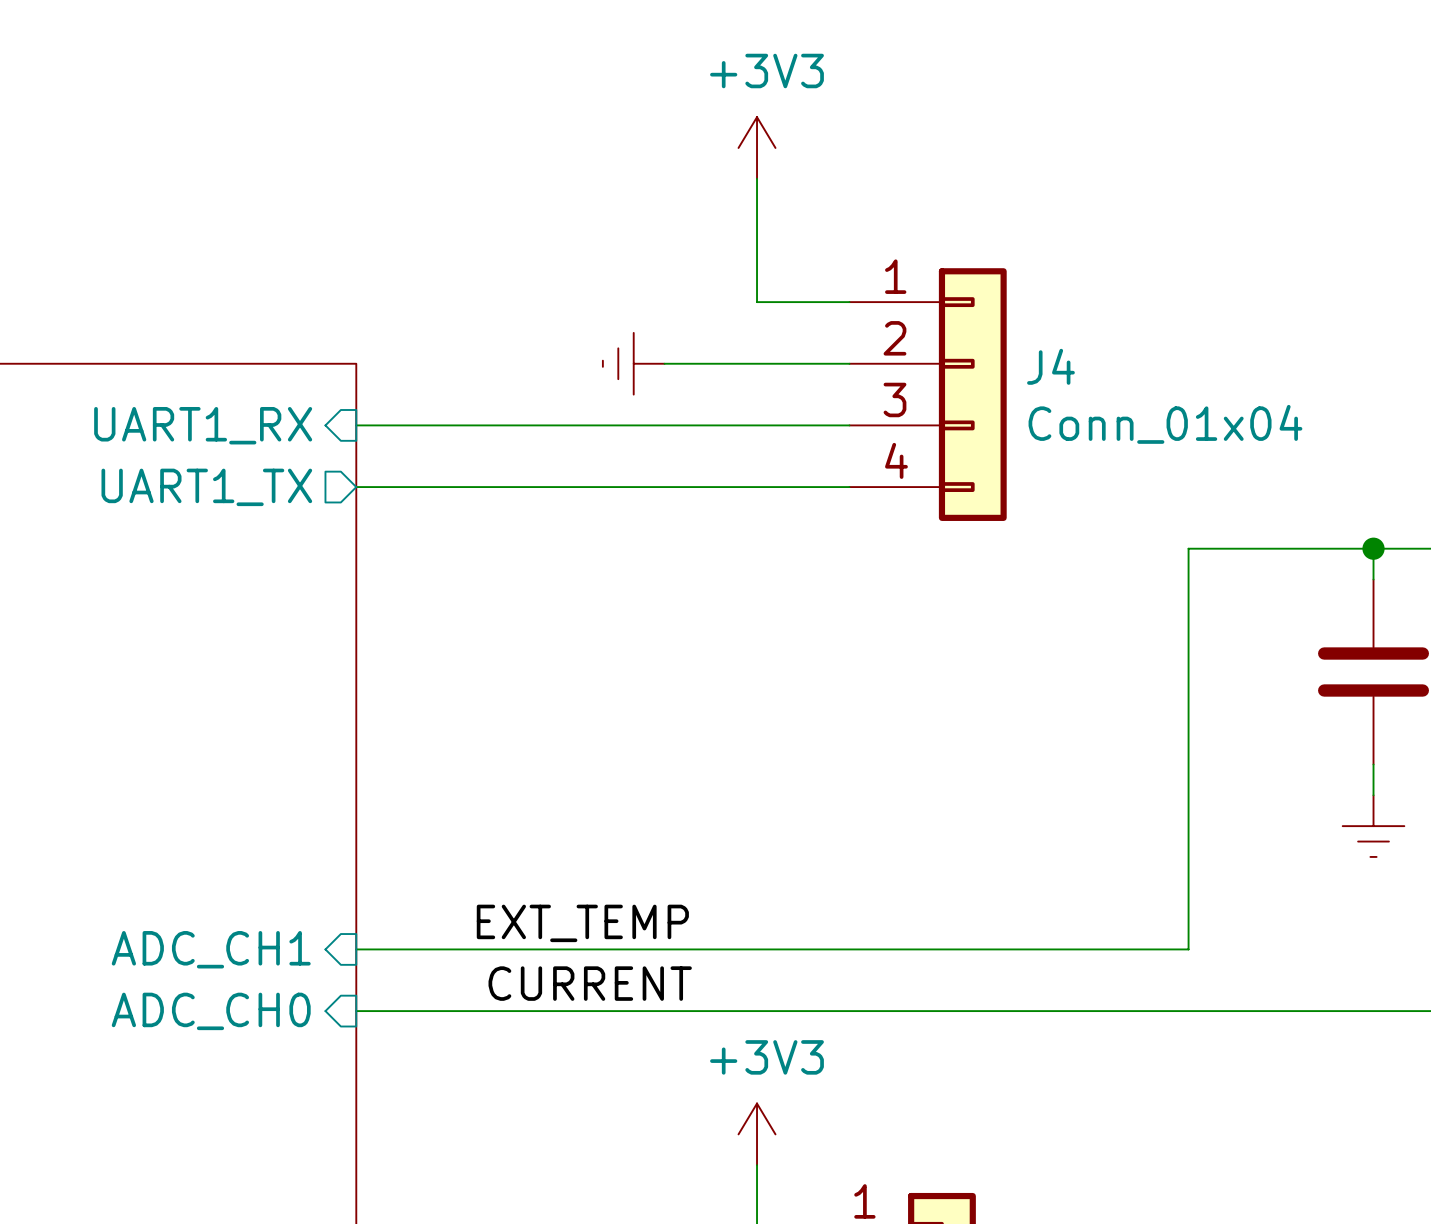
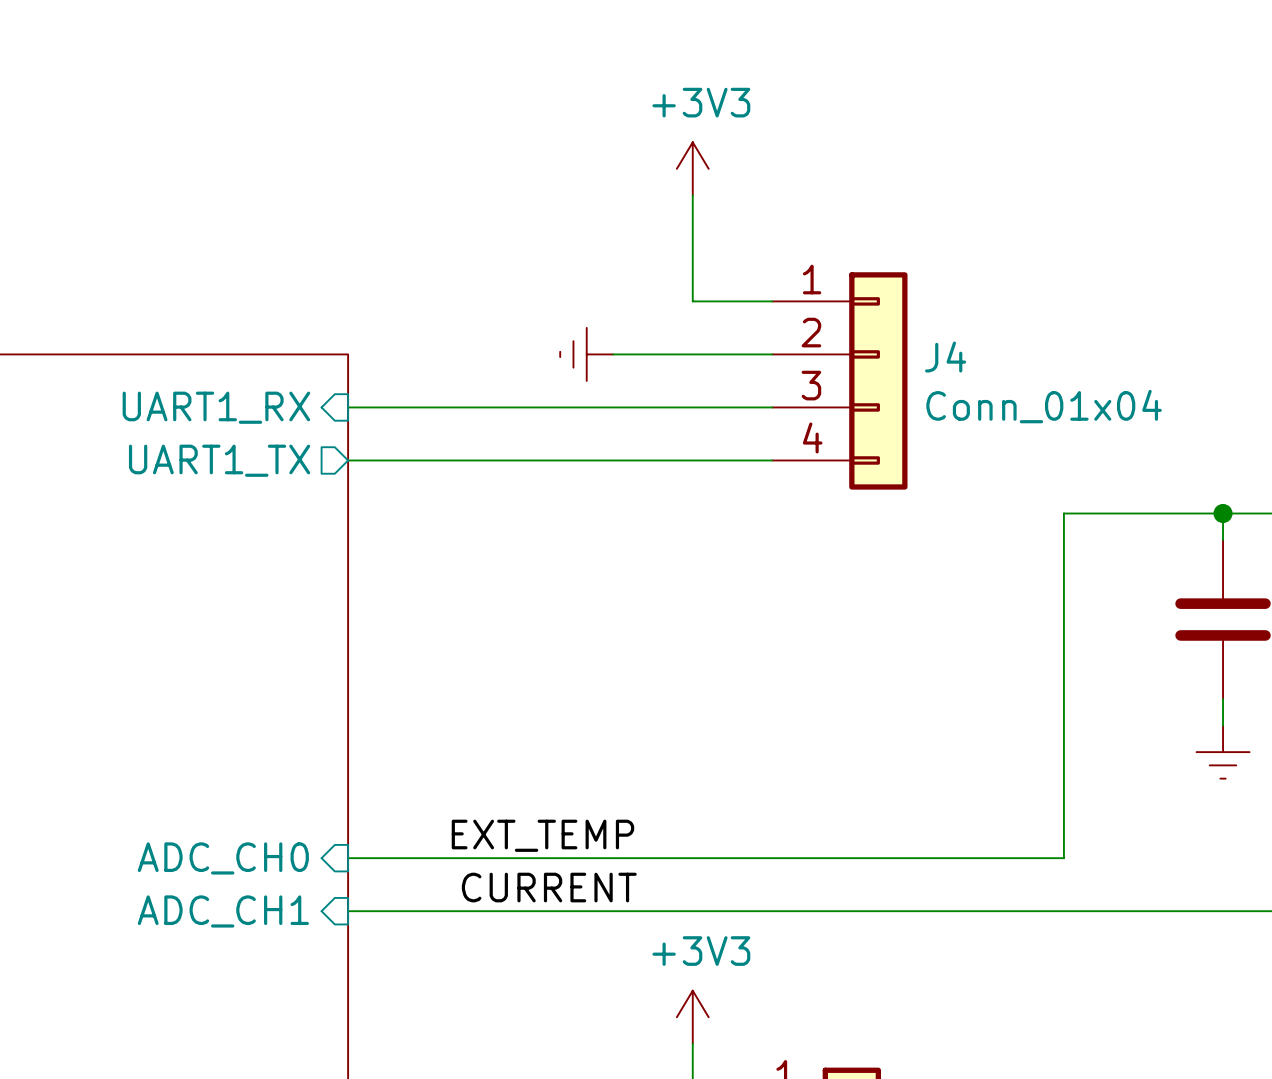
sheet pin: ADC_CH1 (211, 949) -> ADC_CH0 (223, 858)
sheet pin: ADC_CH0 (211, 1011) -> ADC_CH1 (223, 911)

